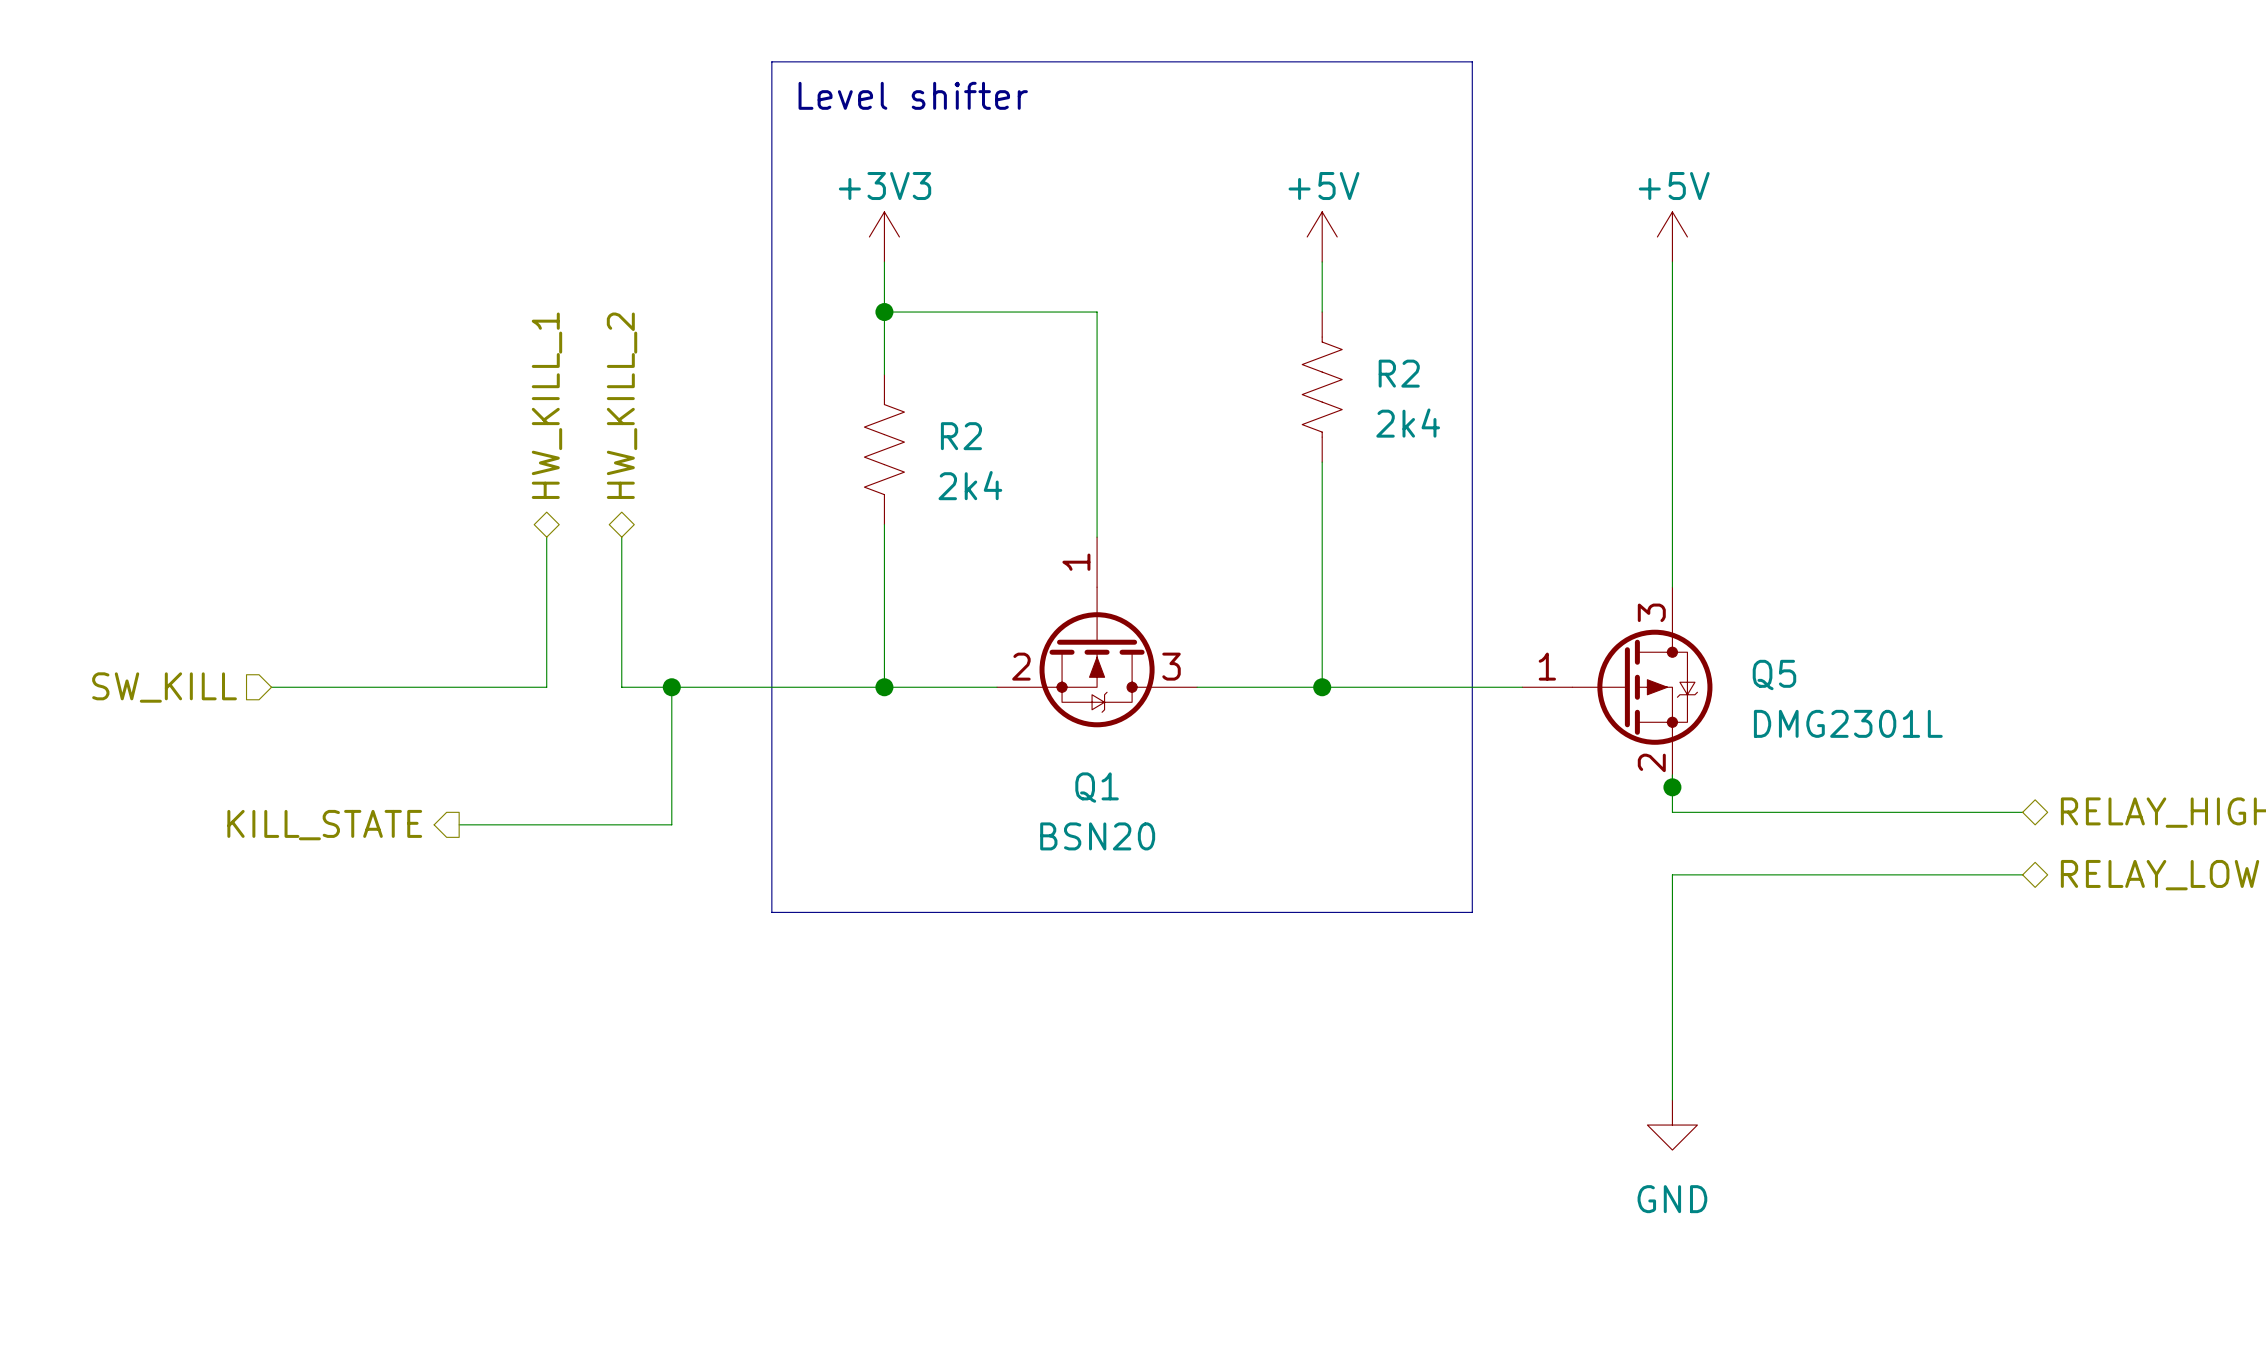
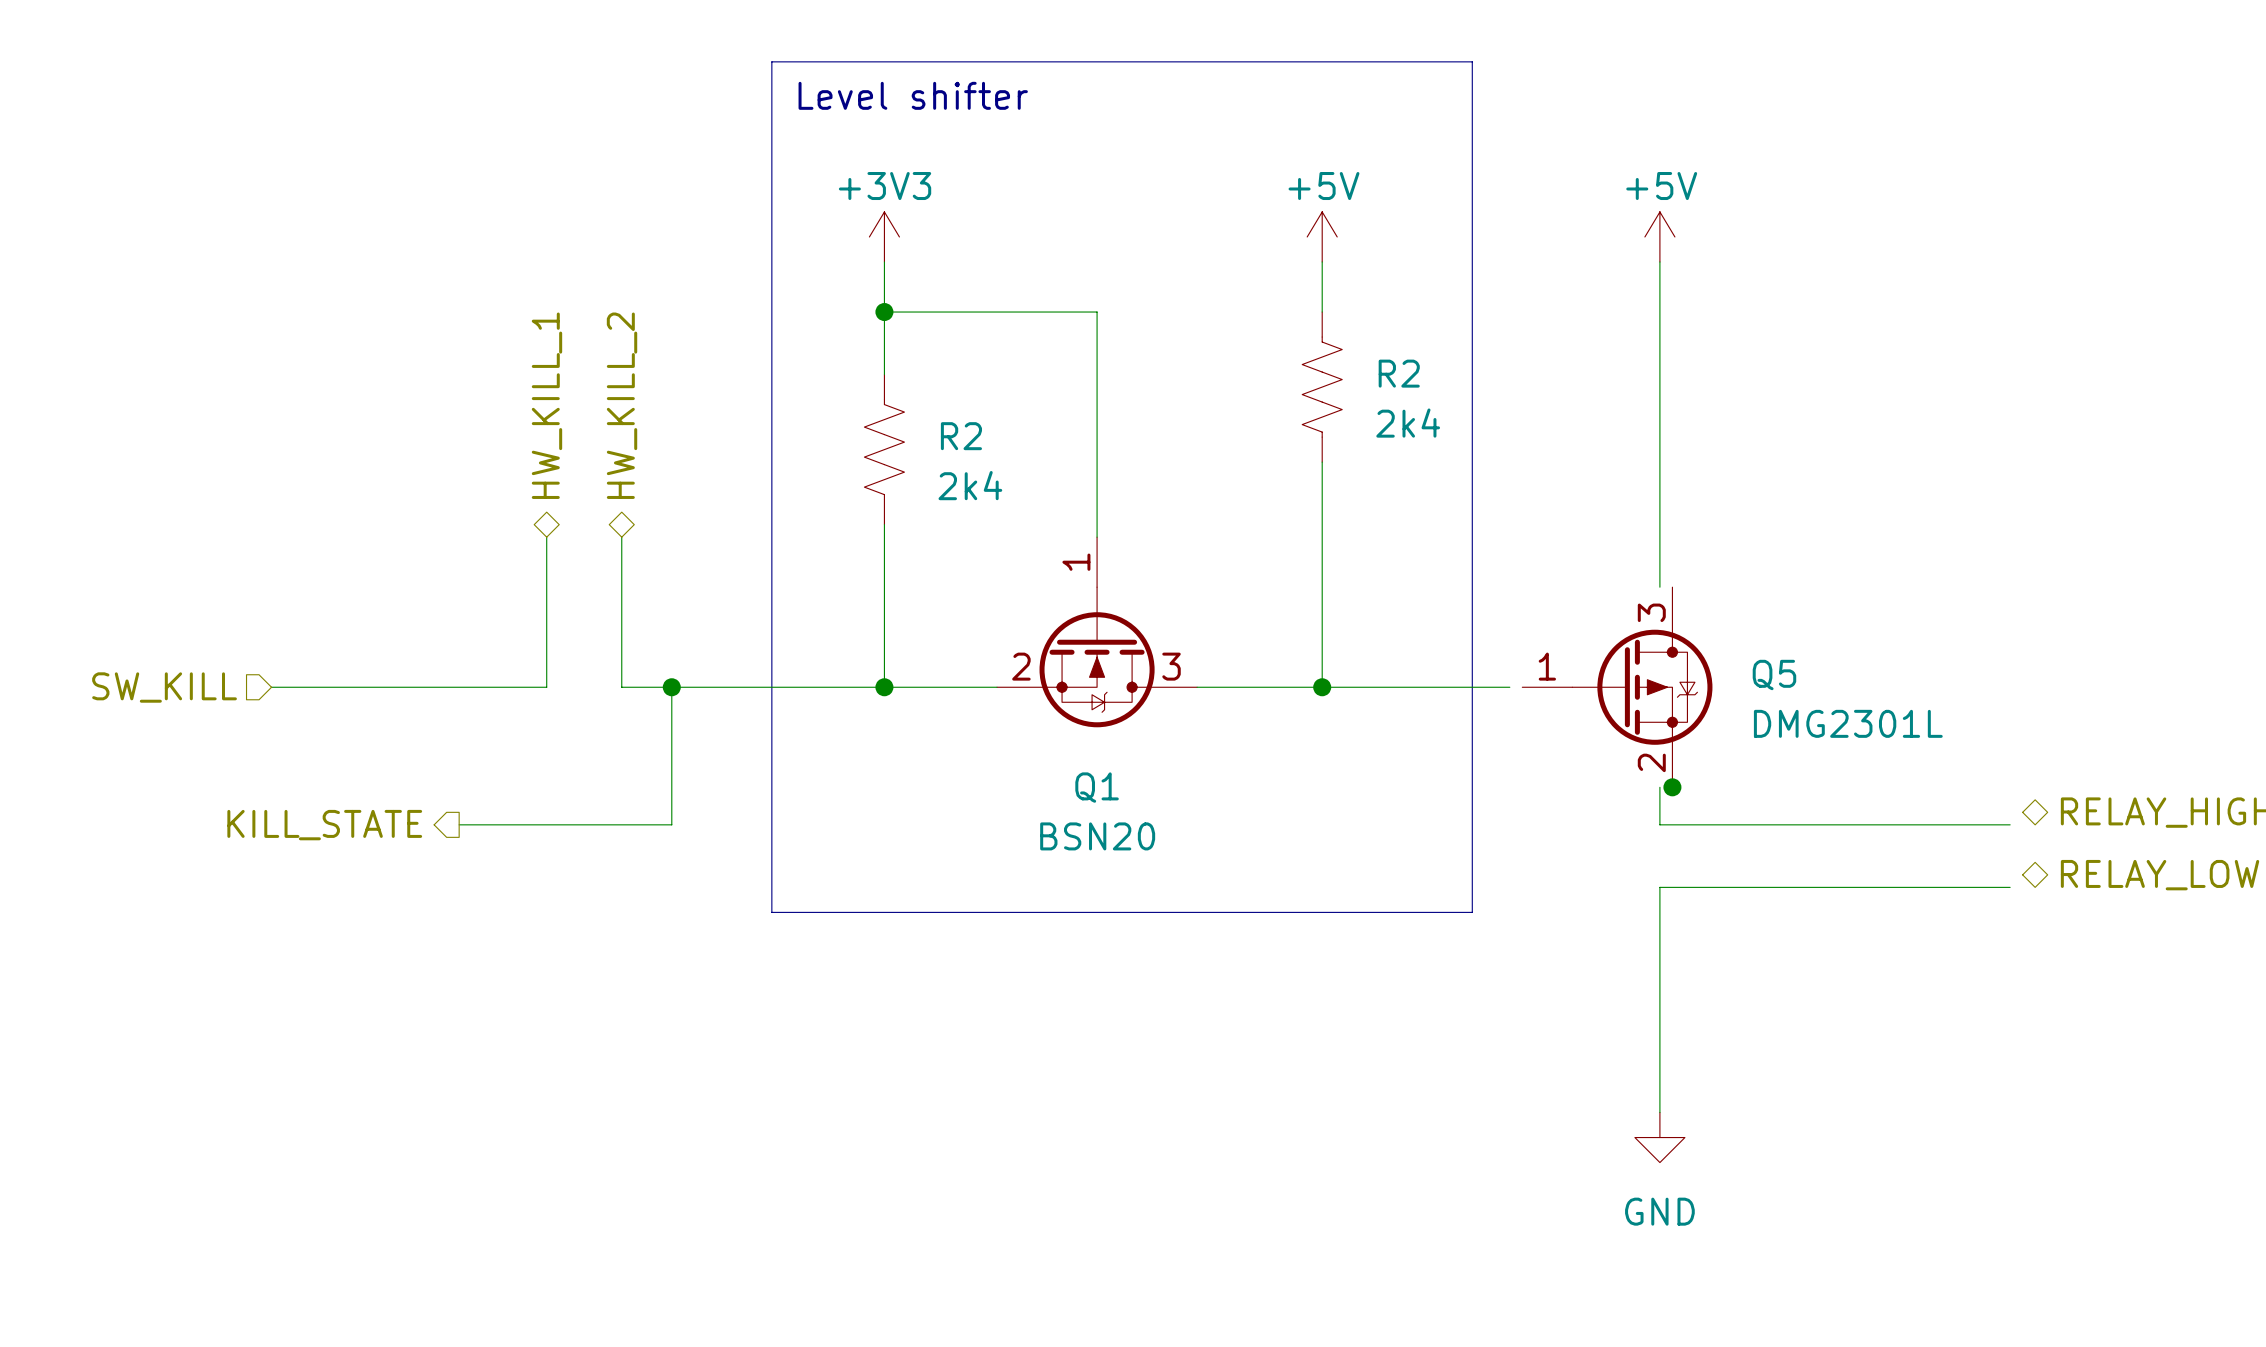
power symbol position: +5V (1672, 236) -> +5V (1659, 236)
wire: (1672, 261) (1672, 587) -> (1659, 261) (1659, 587)
wire: (1509, 687) (1522, 687) -> none
wire: (1672, 774) (1672, 812) (2022, 812) -> (1659, 787) (1659, 824) (2010, 824)
wire: (2022, 874) (1672, 874) (1672, 1100) -> (2010, 887) (1659, 887) (1659, 1112)
power symbol position: GND (1672, 1125) -> GND (1659, 1137)

